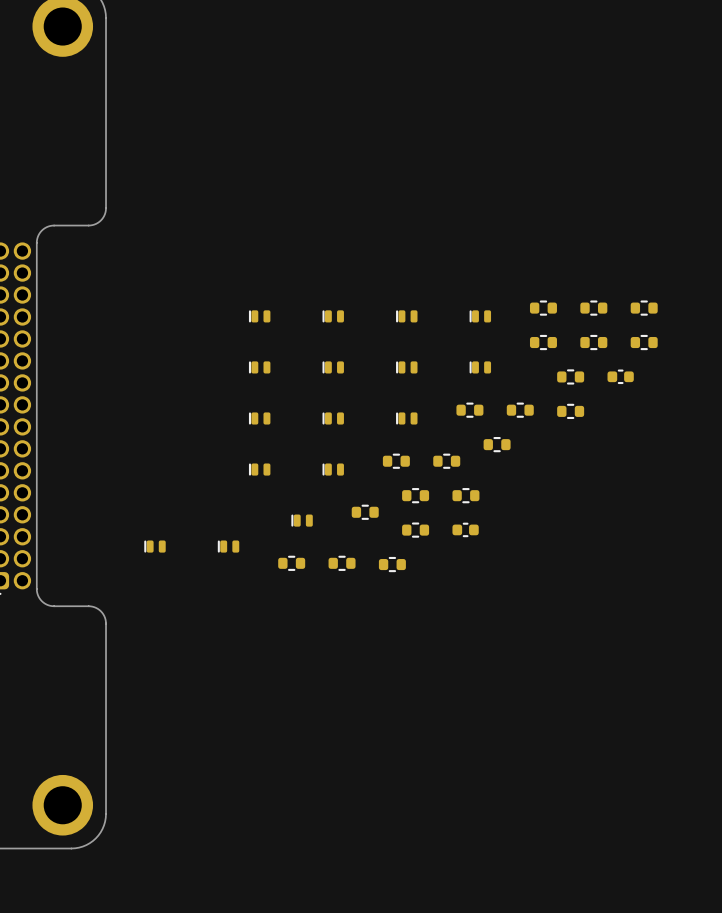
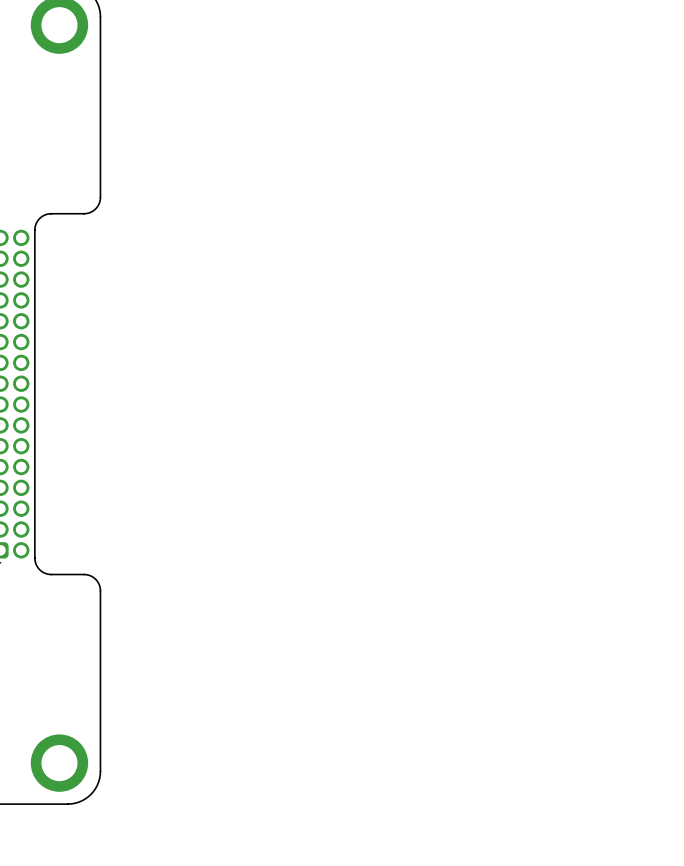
part: (543, 308) -> none
part: (593, 308) -> none
part: (644, 308) -> none
part: (259, 316) -> none
part: (333, 316) -> none
part: (406, 316) -> none
part: (480, 316) -> none
part: (543, 342) -> none
part: (593, 342) -> none
part: (644, 342) -> none
part: (259, 367) -> none
part: (333, 367) -> none
part: (406, 367) -> none
part: (480, 367) -> none
part: (570, 376) -> none
part: (620, 376) -> none
part: (469, 410) -> none
part: (520, 410) -> none
part: (570, 411) -> none
part: (259, 418) -> none
part: (333, 418) -> none
part: (406, 418) -> none
part: (497, 444) -> none
part: (396, 461) -> none
part: (446, 461) -> none
part: (259, 469) -> none
part: (333, 469) -> none
part: (415, 495) -> none
part: (465, 495) -> none
part: (365, 512) -> none
part: (302, 520) -> none
part: (465, 529) -> none
part: (415, 530) -> none
part: (154, 546) -> none
part: (228, 546) -> none
part: (291, 563) -> none
part: (342, 563) -> none
part: (392, 564) -> none

